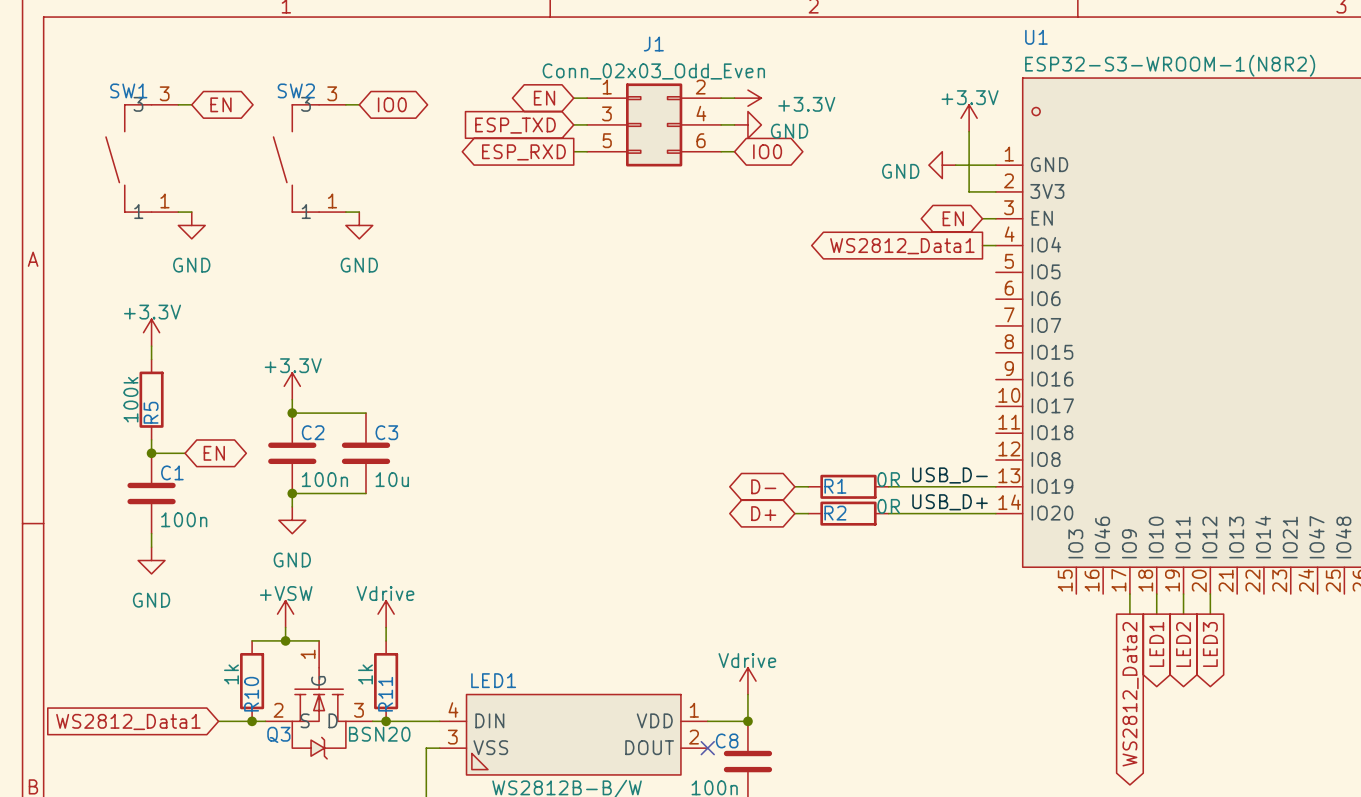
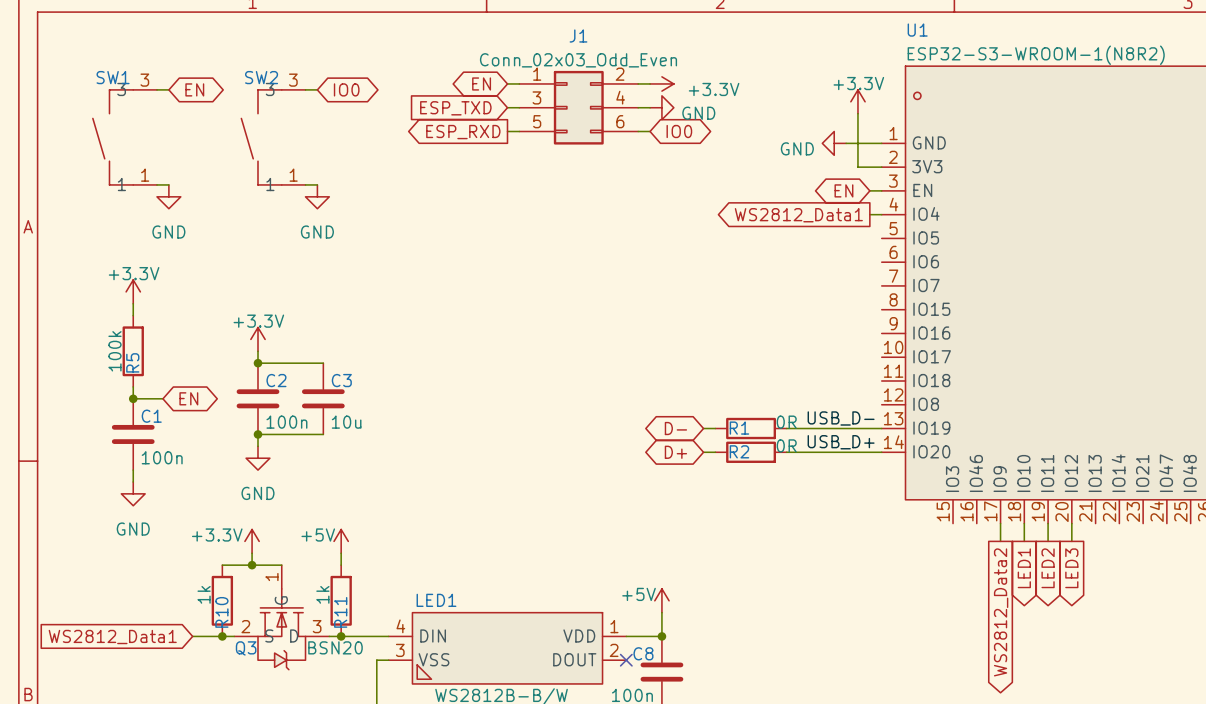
power symbol: +VSW (285, 614) -> +3.3V (252, 541)
power symbol: Vdrive (386, 614) -> +5V (341, 541)
power symbol: Vdrive (747, 681) -> +5V (661, 600)

